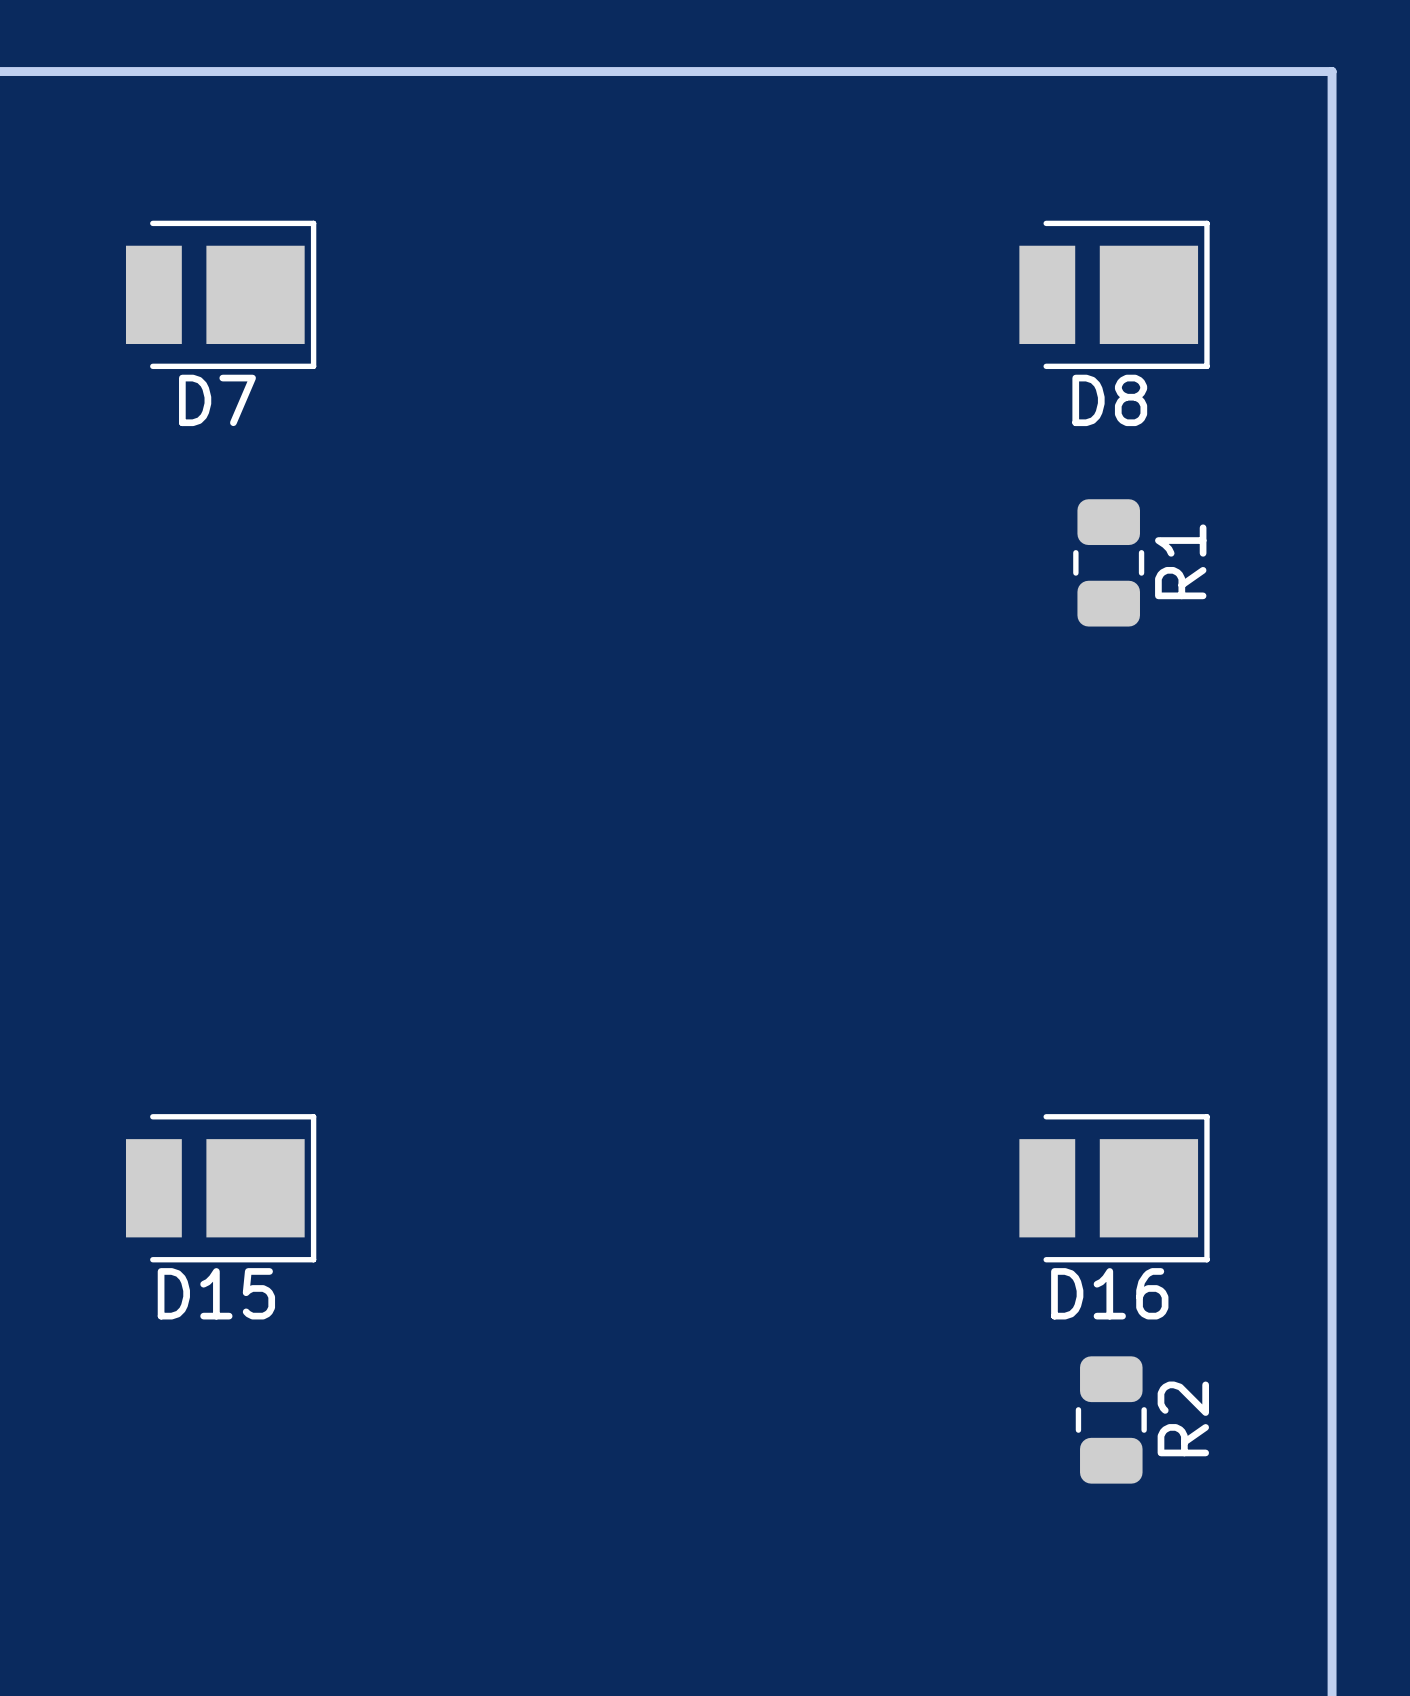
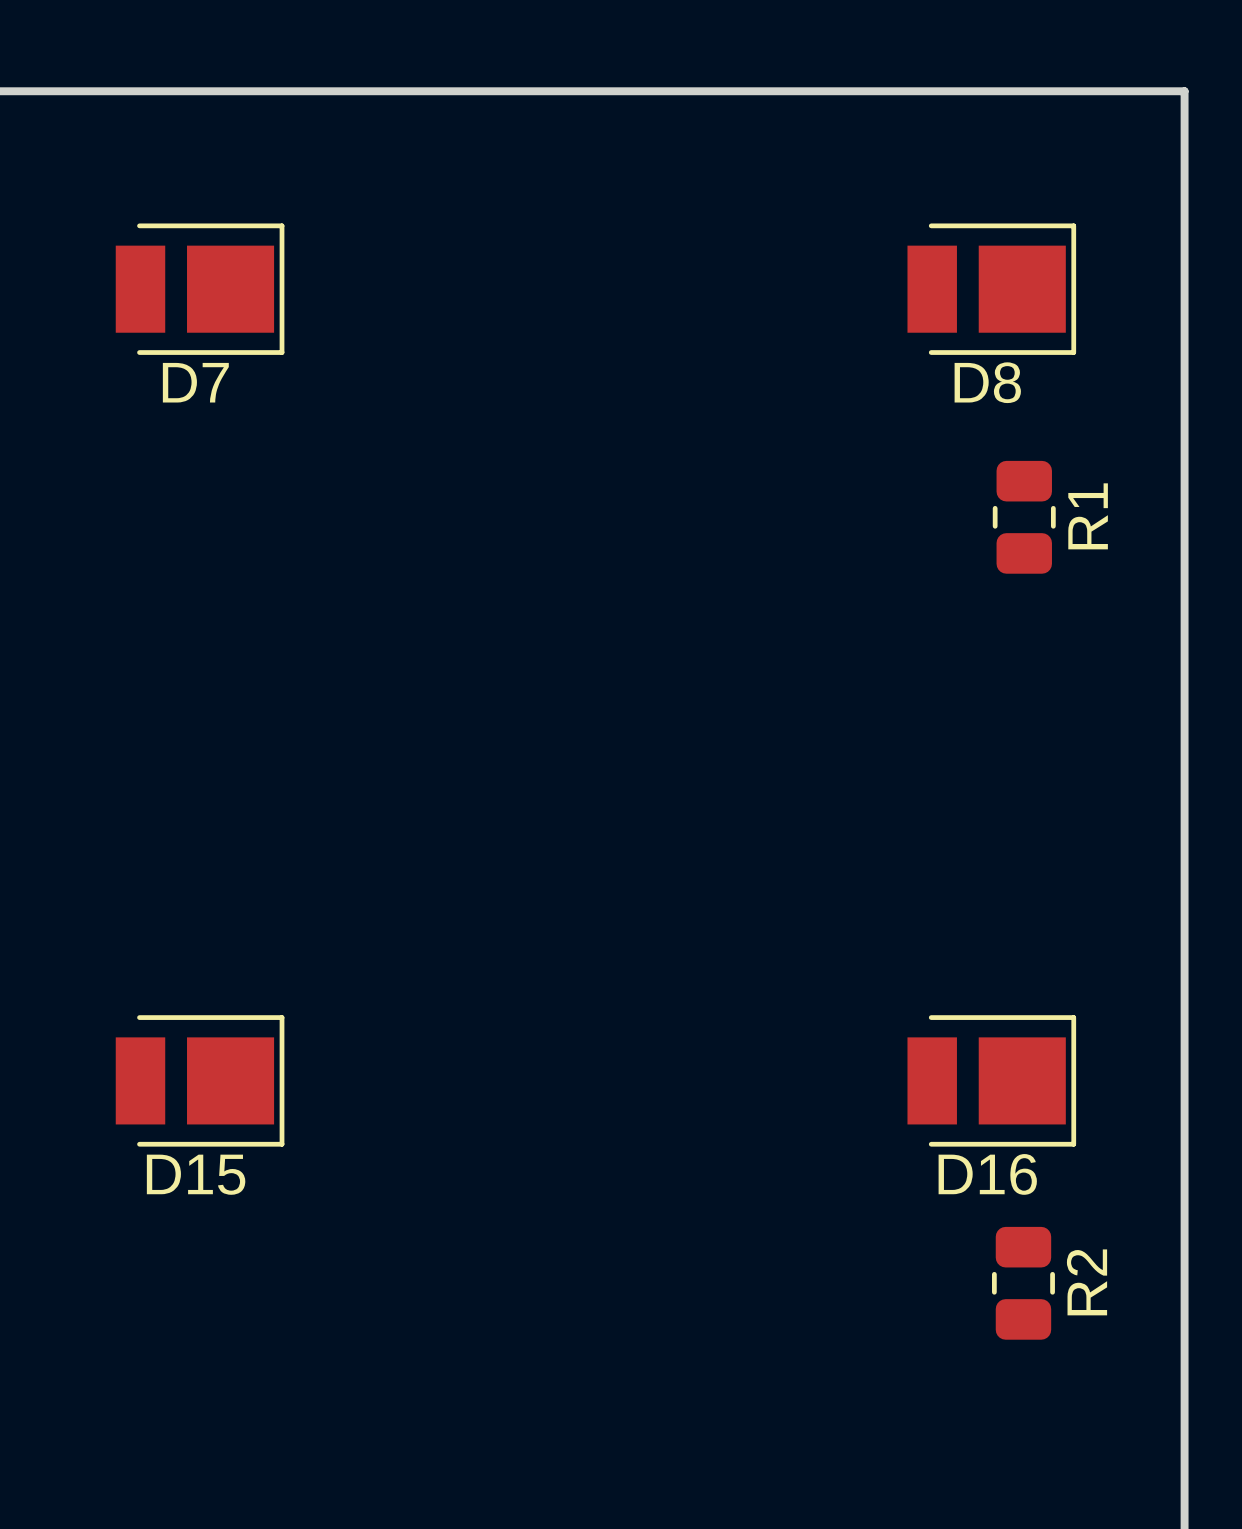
R1 position: (1108, 562) -> (1024, 517)
R2 position: (1111, 1419) -> (1023, 1283)

